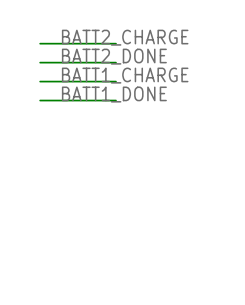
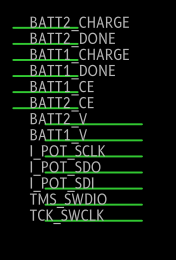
label: none -> BATT1_CE (62, 88)
wire: none -> (13, 92) (77, 92)
label: none -> BATT2_CE (62, 104)
wire: none -> (13, 108) (77, 108)
label: none -> BATT2_V (58, 120)
wire: none -> (45, 124) (141, 124)
label: none -> BATT1_V (58, 136)
wire: none -> (45, 140) (141, 140)
label: none -> I_POT_SCLK (67, 152)
wire: none -> (45, 156) (141, 156)
label: none -> I_POT_SDO (65, 168)
wire: none -> (45, 172) (141, 172)
label: none -> I_POT_SDI (61, 184)
wire: none -> (45, 188) (141, 188)
label: none -> TMS_SWDIO (68, 200)
wire: none -> (45, 204) (141, 204)
label: none -> TCK_SWCLK (66, 216)
wire: none -> (45, 220) (141, 220)

